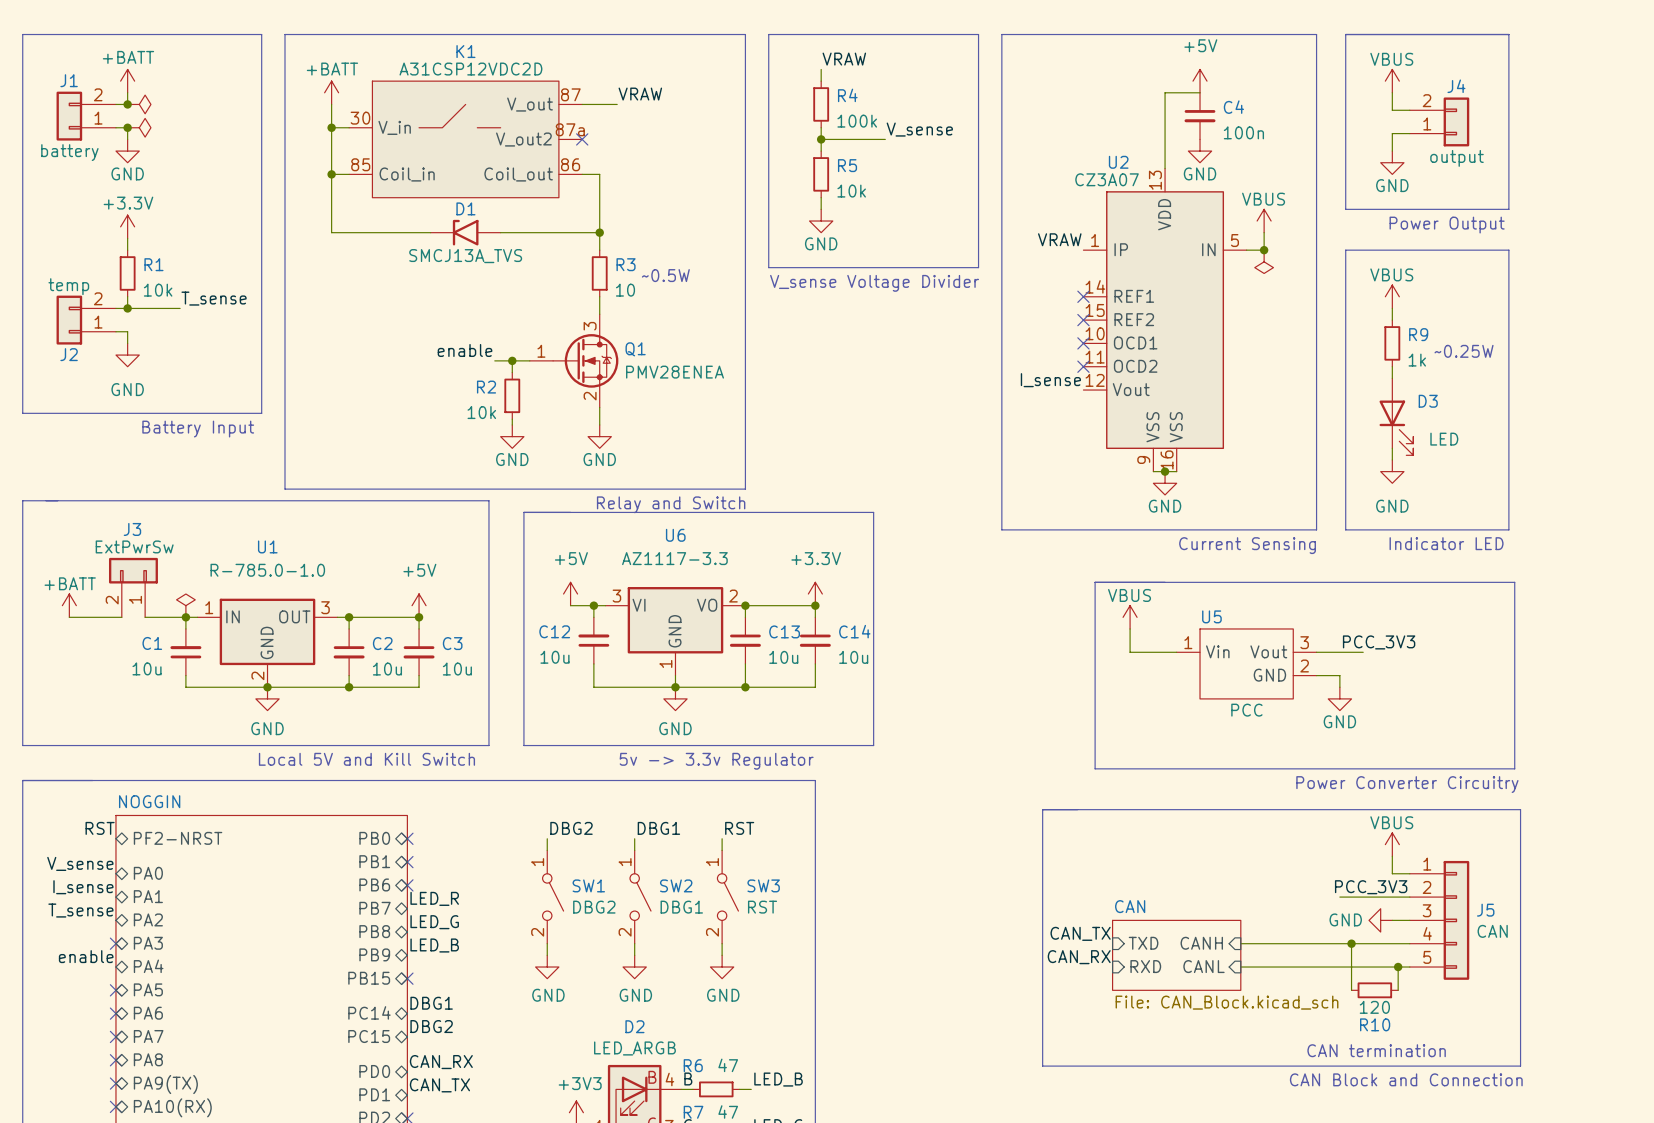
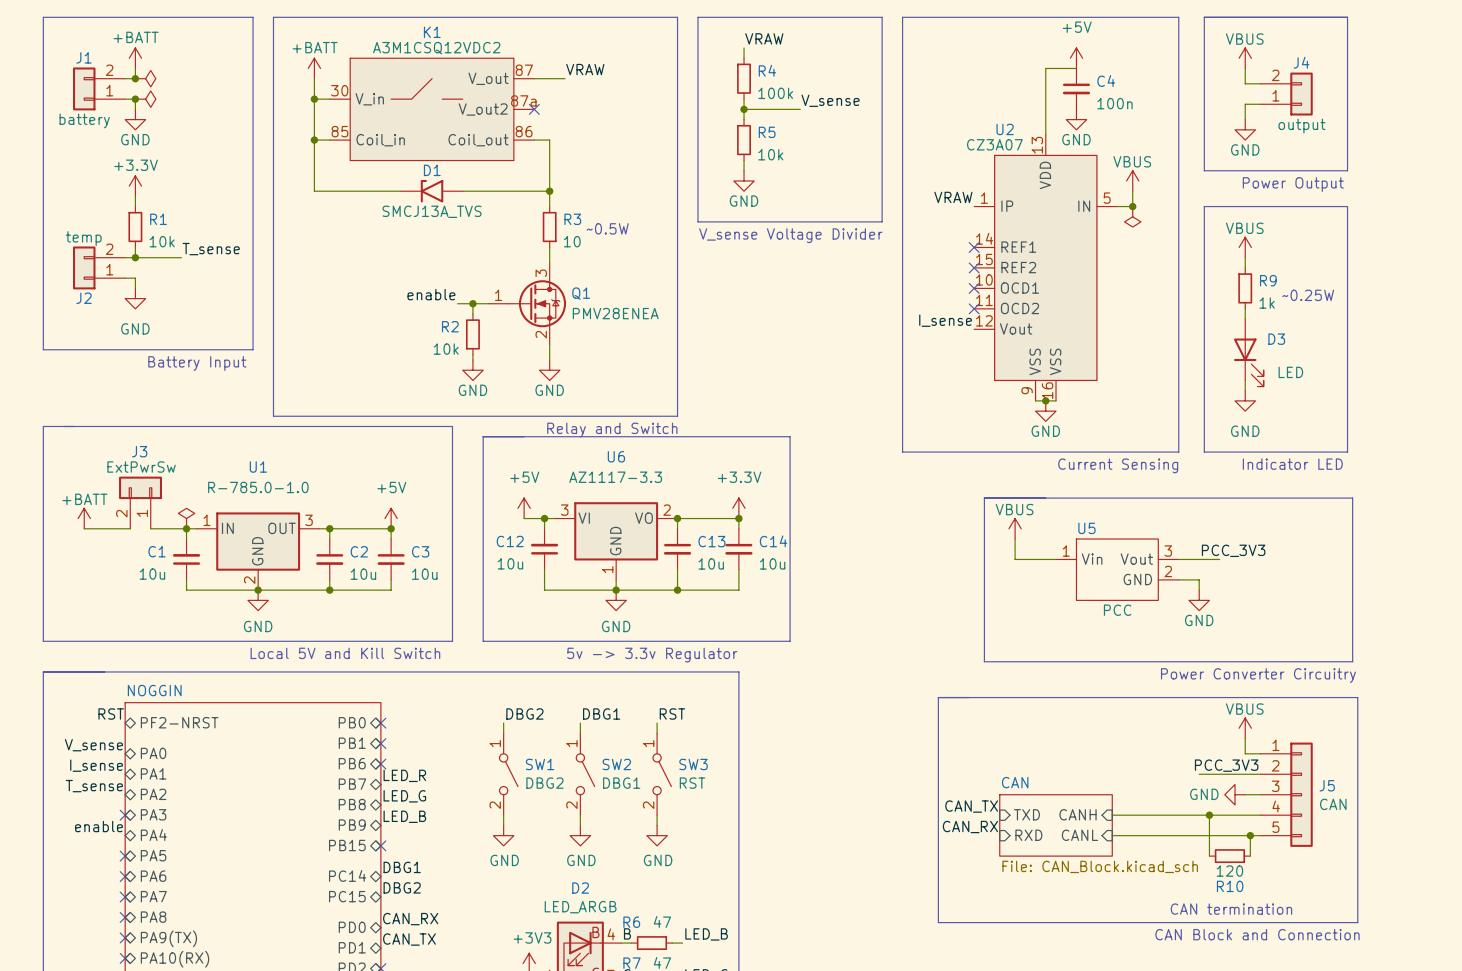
K1 value: A31CSP12VDC2D (470, 69) -> A3M1CSQ12VDC2 (436, 48)

